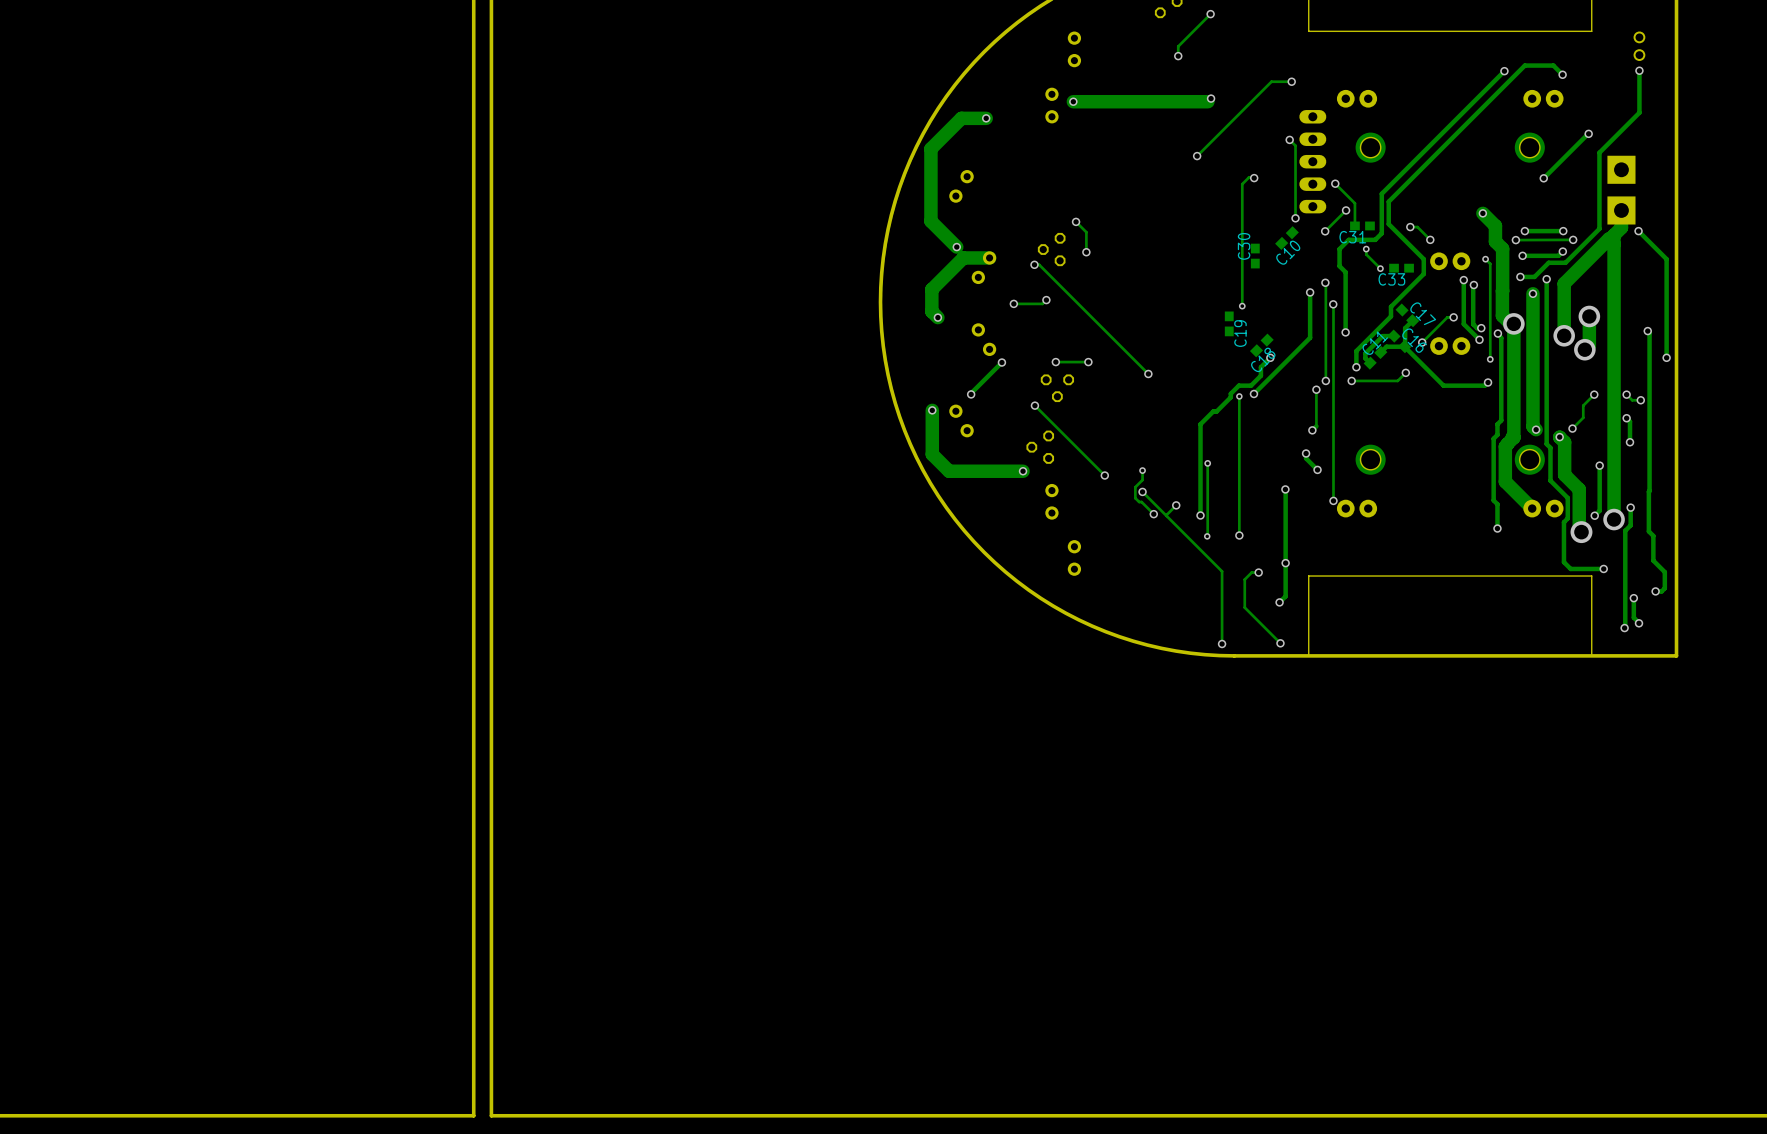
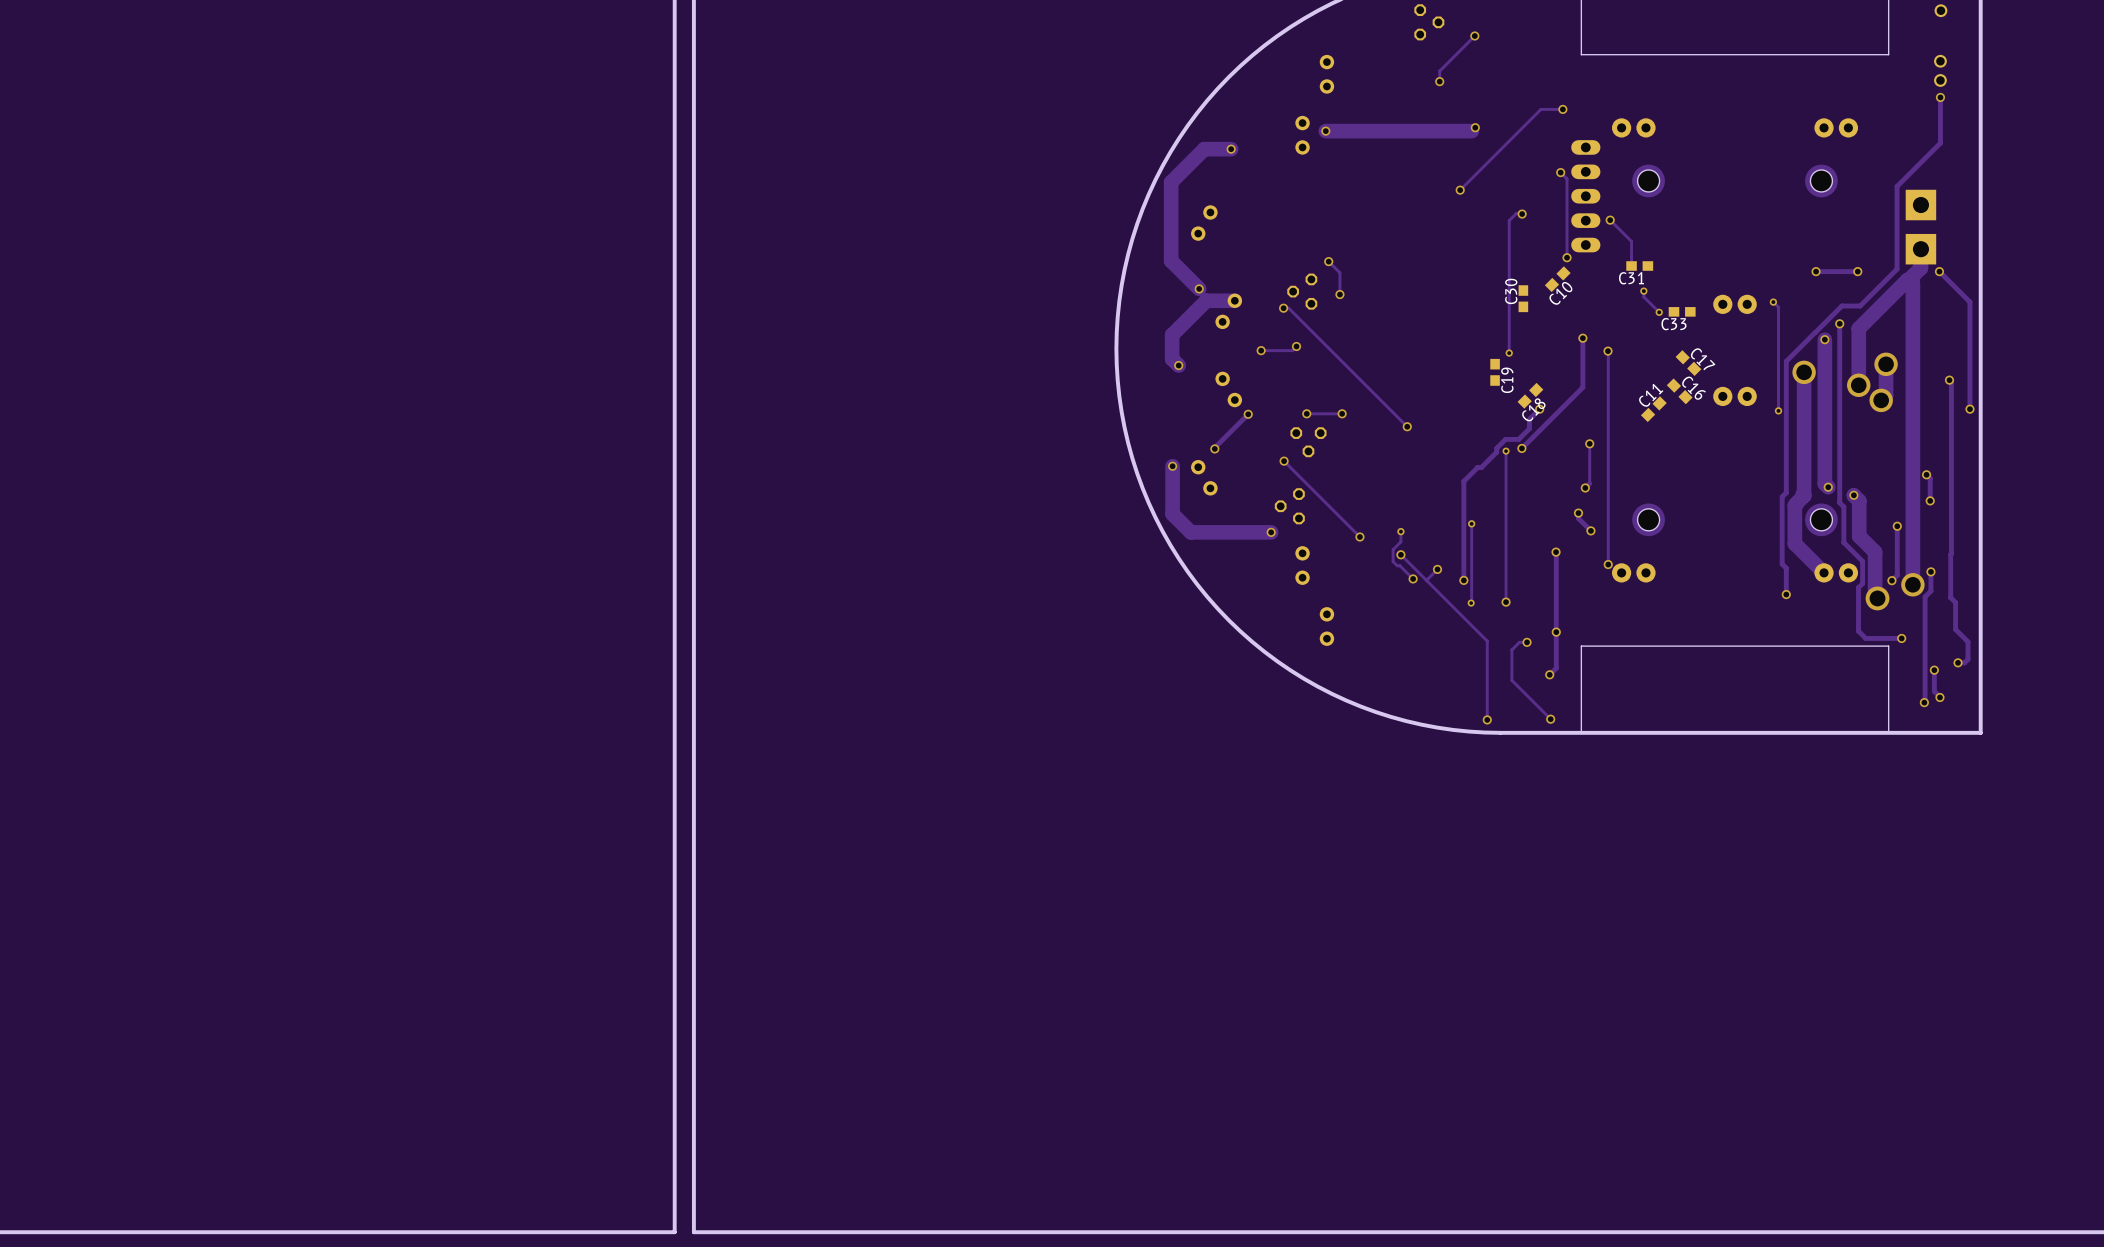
track: (1504, 71) (1381, 193) (1381, 233) (1375, 239) (1348, 239) (1339, 249) (1339, 266) (1345, 272) (1345, 332) -> none
via: (1504, 71) -> none
track: (1562, 74) (1553, 65) (1524, 65) (1388, 201) (1388, 224) (1423, 259) (1423, 274) (1390, 306) (1390, 316) (1356, 351) (1356, 367) -> none
via: (1562, 74) -> none
track: (1588, 133) (1543, 178) -> none
via: (1588, 133) -> none
via: (1543, 178) -> none
track: (1346, 210) (1325, 231) -> none
via: (1346, 210) -> none
track: (1482, 213) (1495, 225) (1495, 241) (1502, 248) (1502, 315) (1510, 323) (1513, 323) -> none
via: (1482, 213) -> none
track: (1410, 227) (1417, 227) (1430, 239) -> none
via: (1410, 227) -> none
via: (1325, 231) -> none
via: (1430, 239) -> none
track: (1573, 239) (1515, 240) -> none
via: (1573, 239) -> none
via: (1515, 240) -> none
track: (1562, 251) (1558, 255) (1522, 255) -> none
via: (1562, 251) -> none
via: (1522, 255) -> none
via: (1520, 276) -> none
track: (1534, 276) (1520, 276) -> none
track: (1463, 280) (1463, 324) (1479, 339) -> none
via: (1463, 280) -> none
track: (1325, 282) (1325, 380) -> none
via: (1325, 282) -> none
track: (1473, 285) (1473, 324) (1477, 328) (1481, 328) -> none
via: (1473, 285) -> none
track: (1453, 317) (1447, 317) (1422, 342) -> none
via: (1453, 317) -> none
track: (1412, 320) (1405, 328) (1404, 346) -> none
via: (1481, 328) -> none
via: (1345, 332) -> none
track: (1497, 333) (1501, 338) (1501, 420) (1497, 424) -> (1826, 321) (1786, 361) (1786, 481)
via: (1497, 333) -> none
track: (1393, 336) (1382, 336) (1365, 353) (1365, 358) (1370, 363) -> none
via: (1479, 339) -> none
via: (1422, 342) -> none
track: (1404, 346) (1443, 385) (1484, 385) (1488, 382) -> none
track: (1404, 346) (1386, 346) (1380, 352) -> none
via: (1356, 367) -> none
track: (1405, 372) (1397, 380) (1351, 380) -> none
via: (1405, 372) -> none
via: (1325, 380) -> none
via: (1351, 380) -> none
via: (1488, 382) -> none
track: (1594, 394) (1583, 405) (1583, 417) (1572, 428) -> none
via: (1594, 394) -> none
track: (1626, 394) (1632, 400) (1640, 400) -> none
via: (1626, 394) -> none
via: (1640, 400) -> none
via: (1572, 428) -> none

